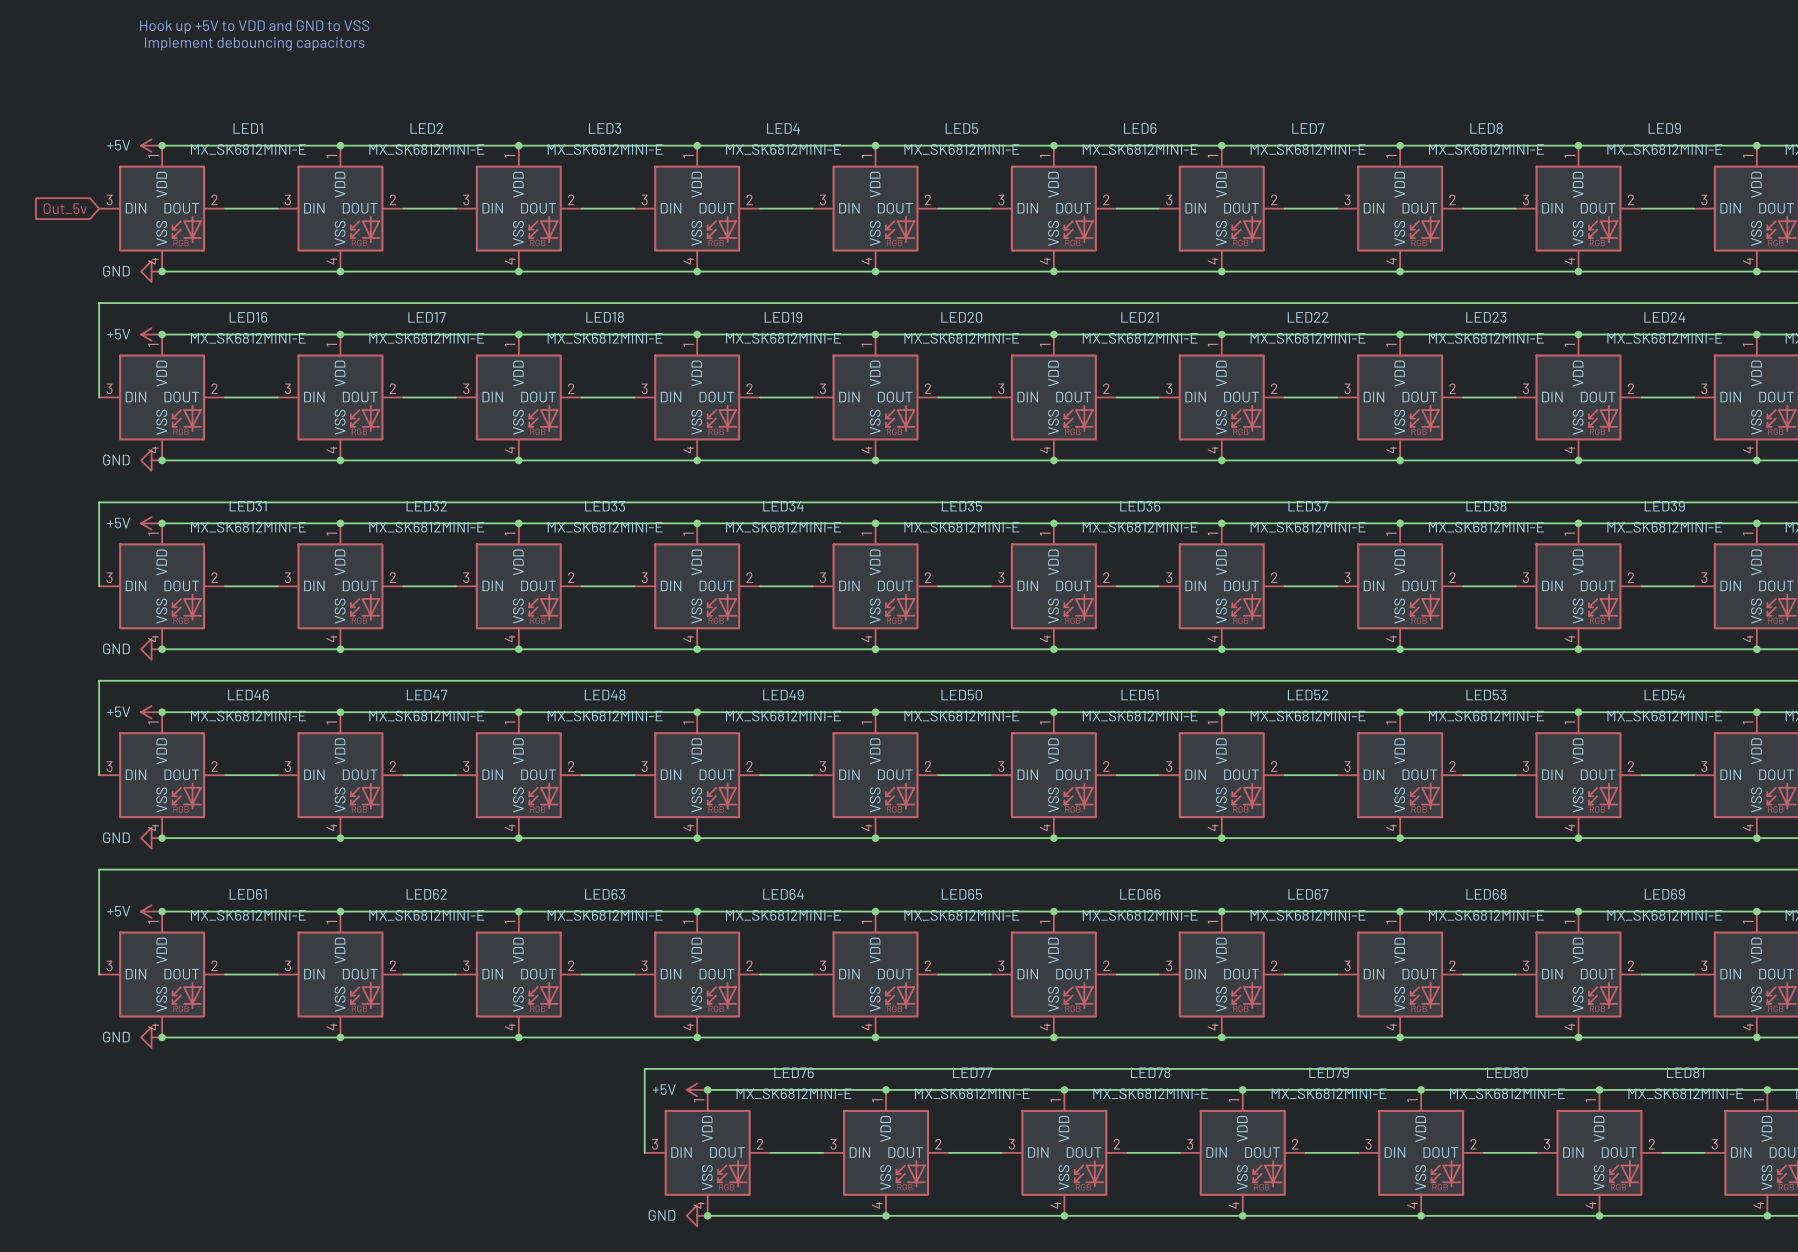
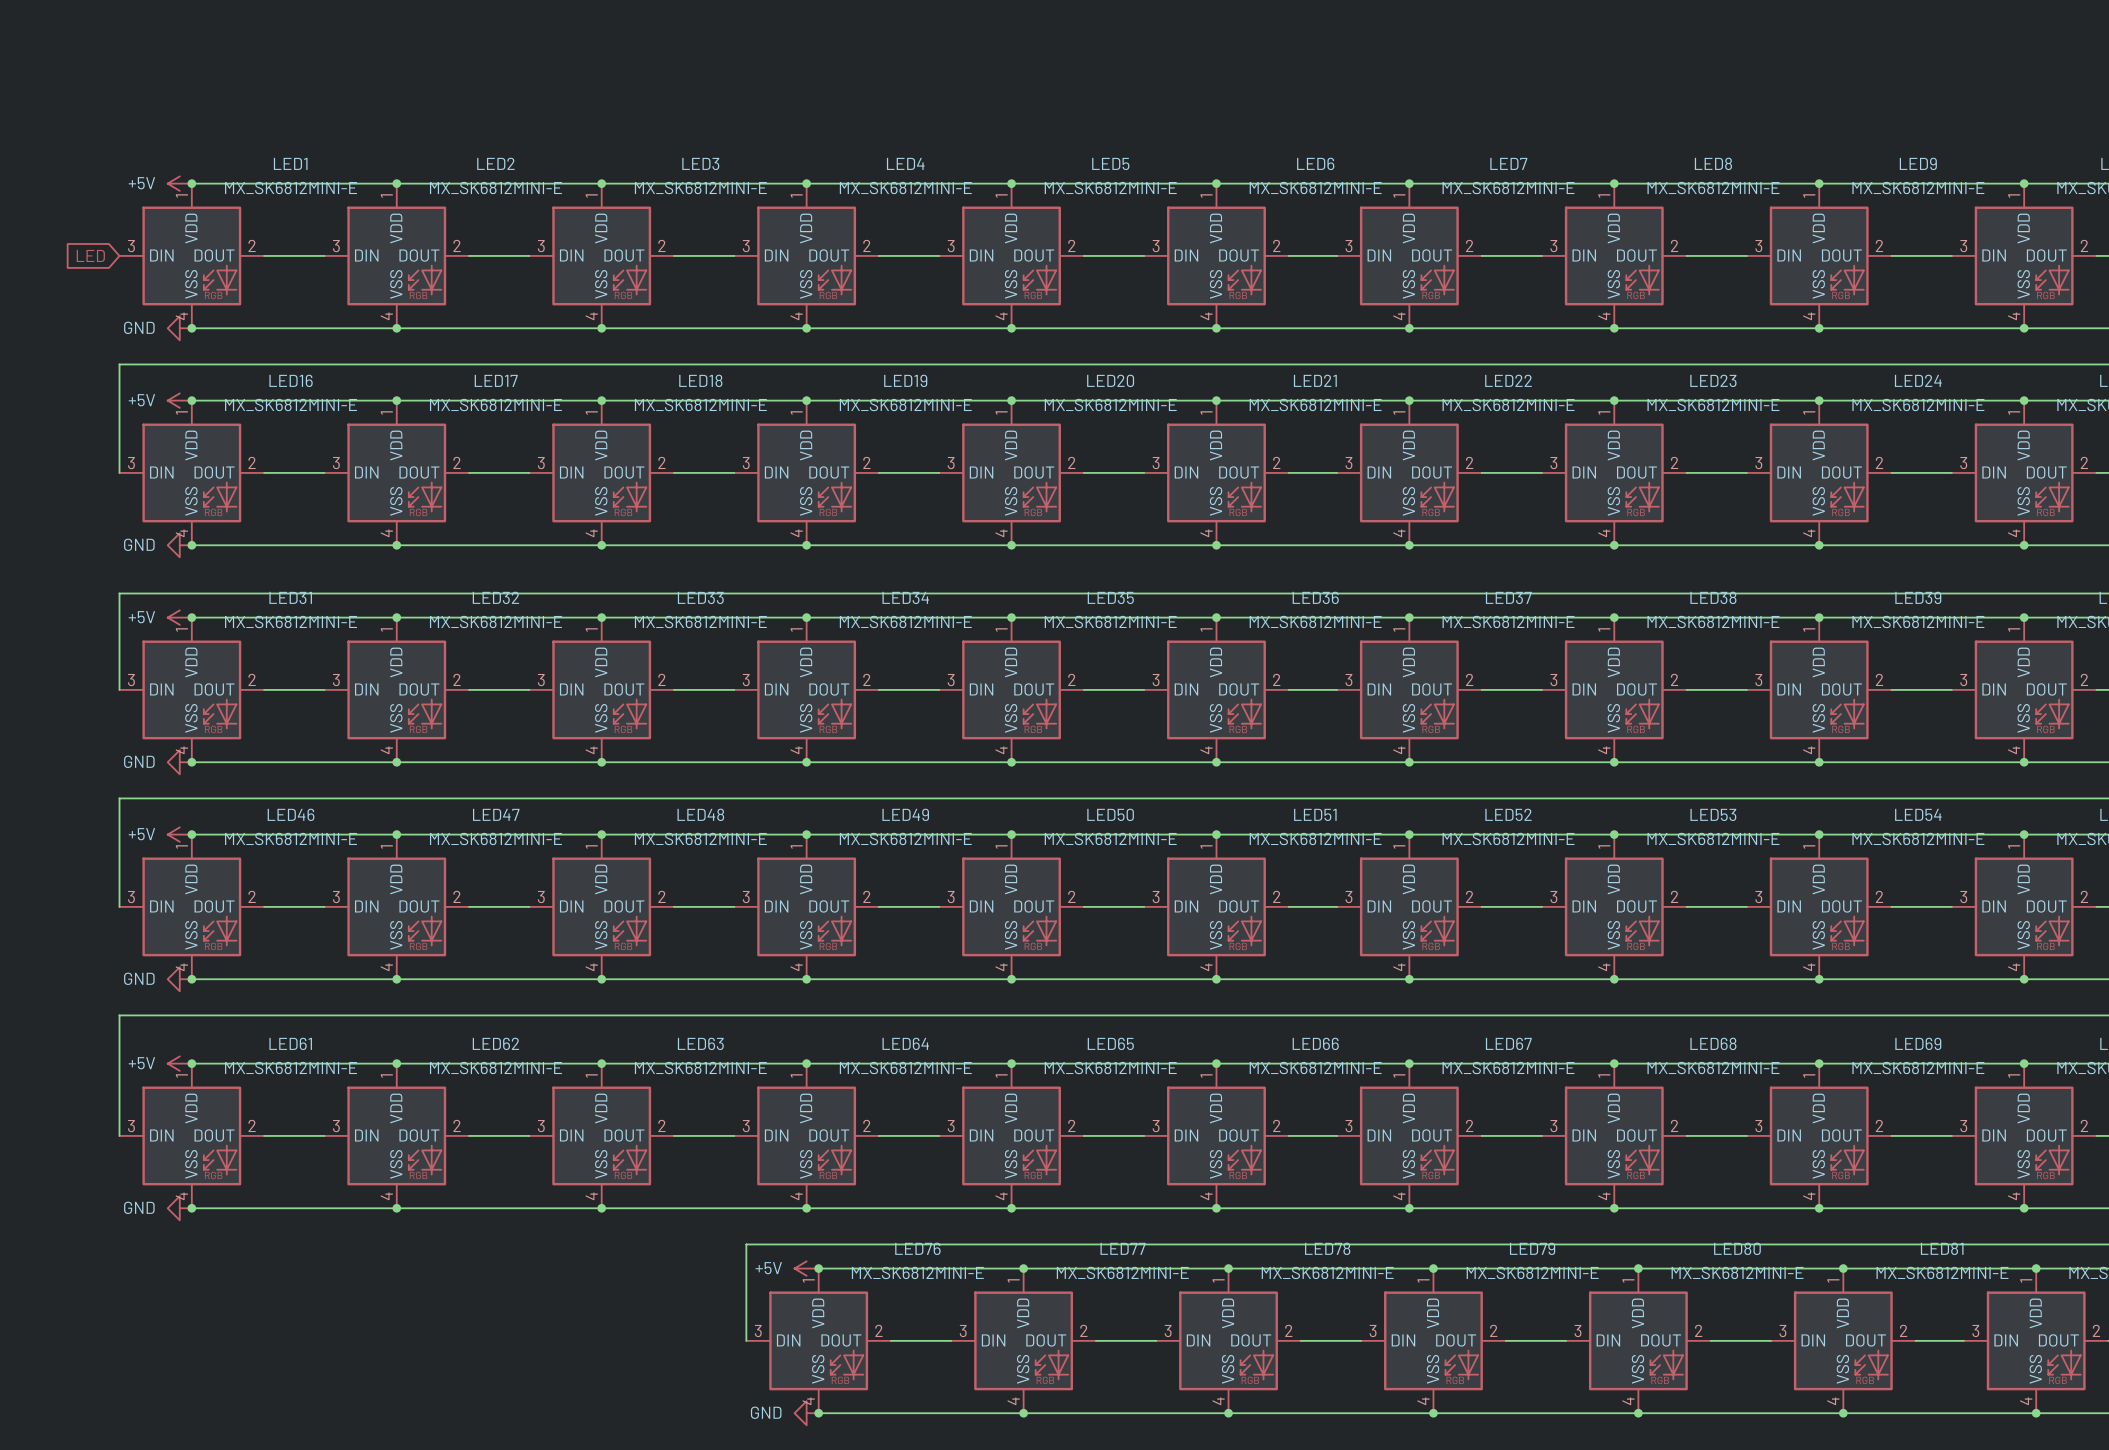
text: Hook up +5V to VDD and GND to VSS (254, 27) -> none
text: Implement debouncing capacitors (254, 43) -> none
global label: Out_5v (65, 208) -> LED (90, 255)

